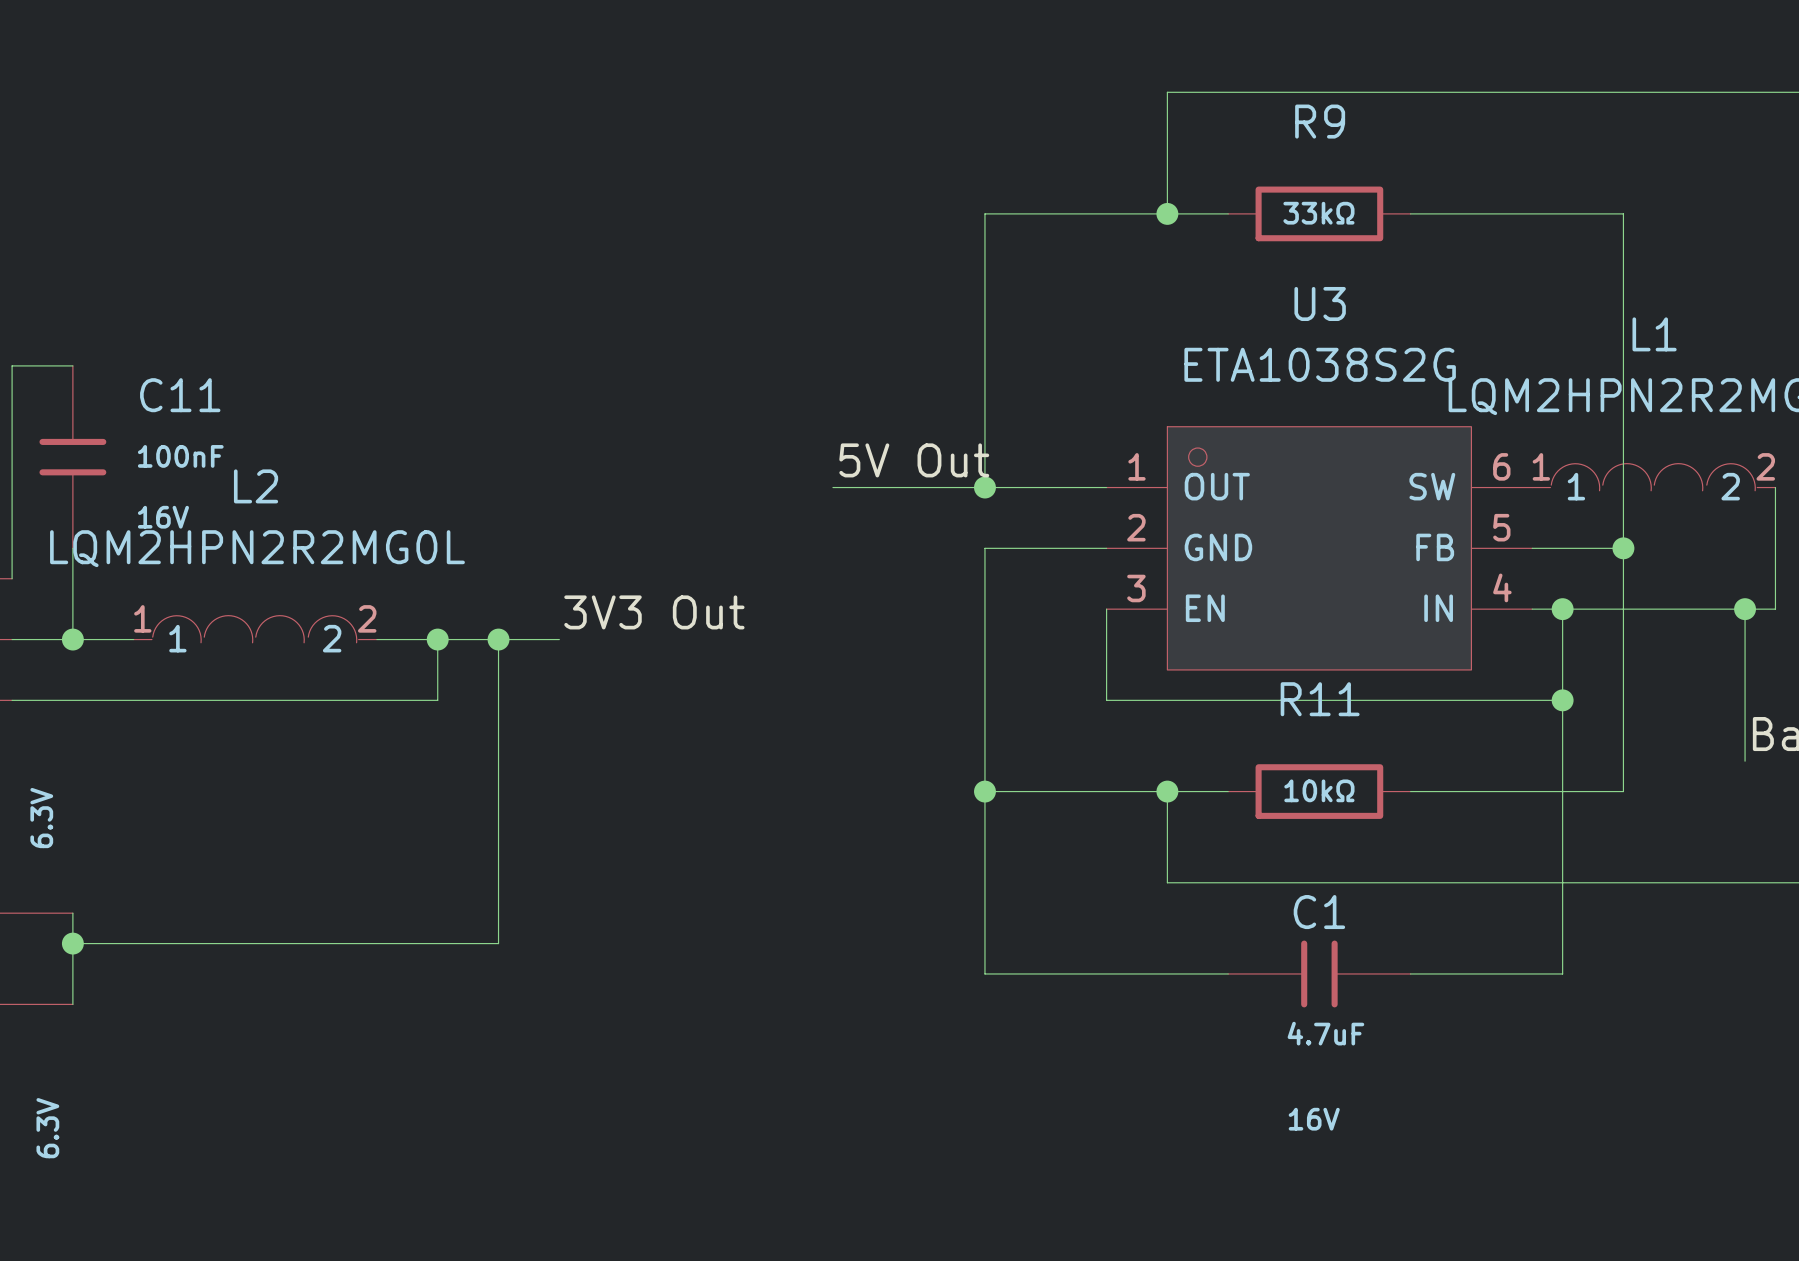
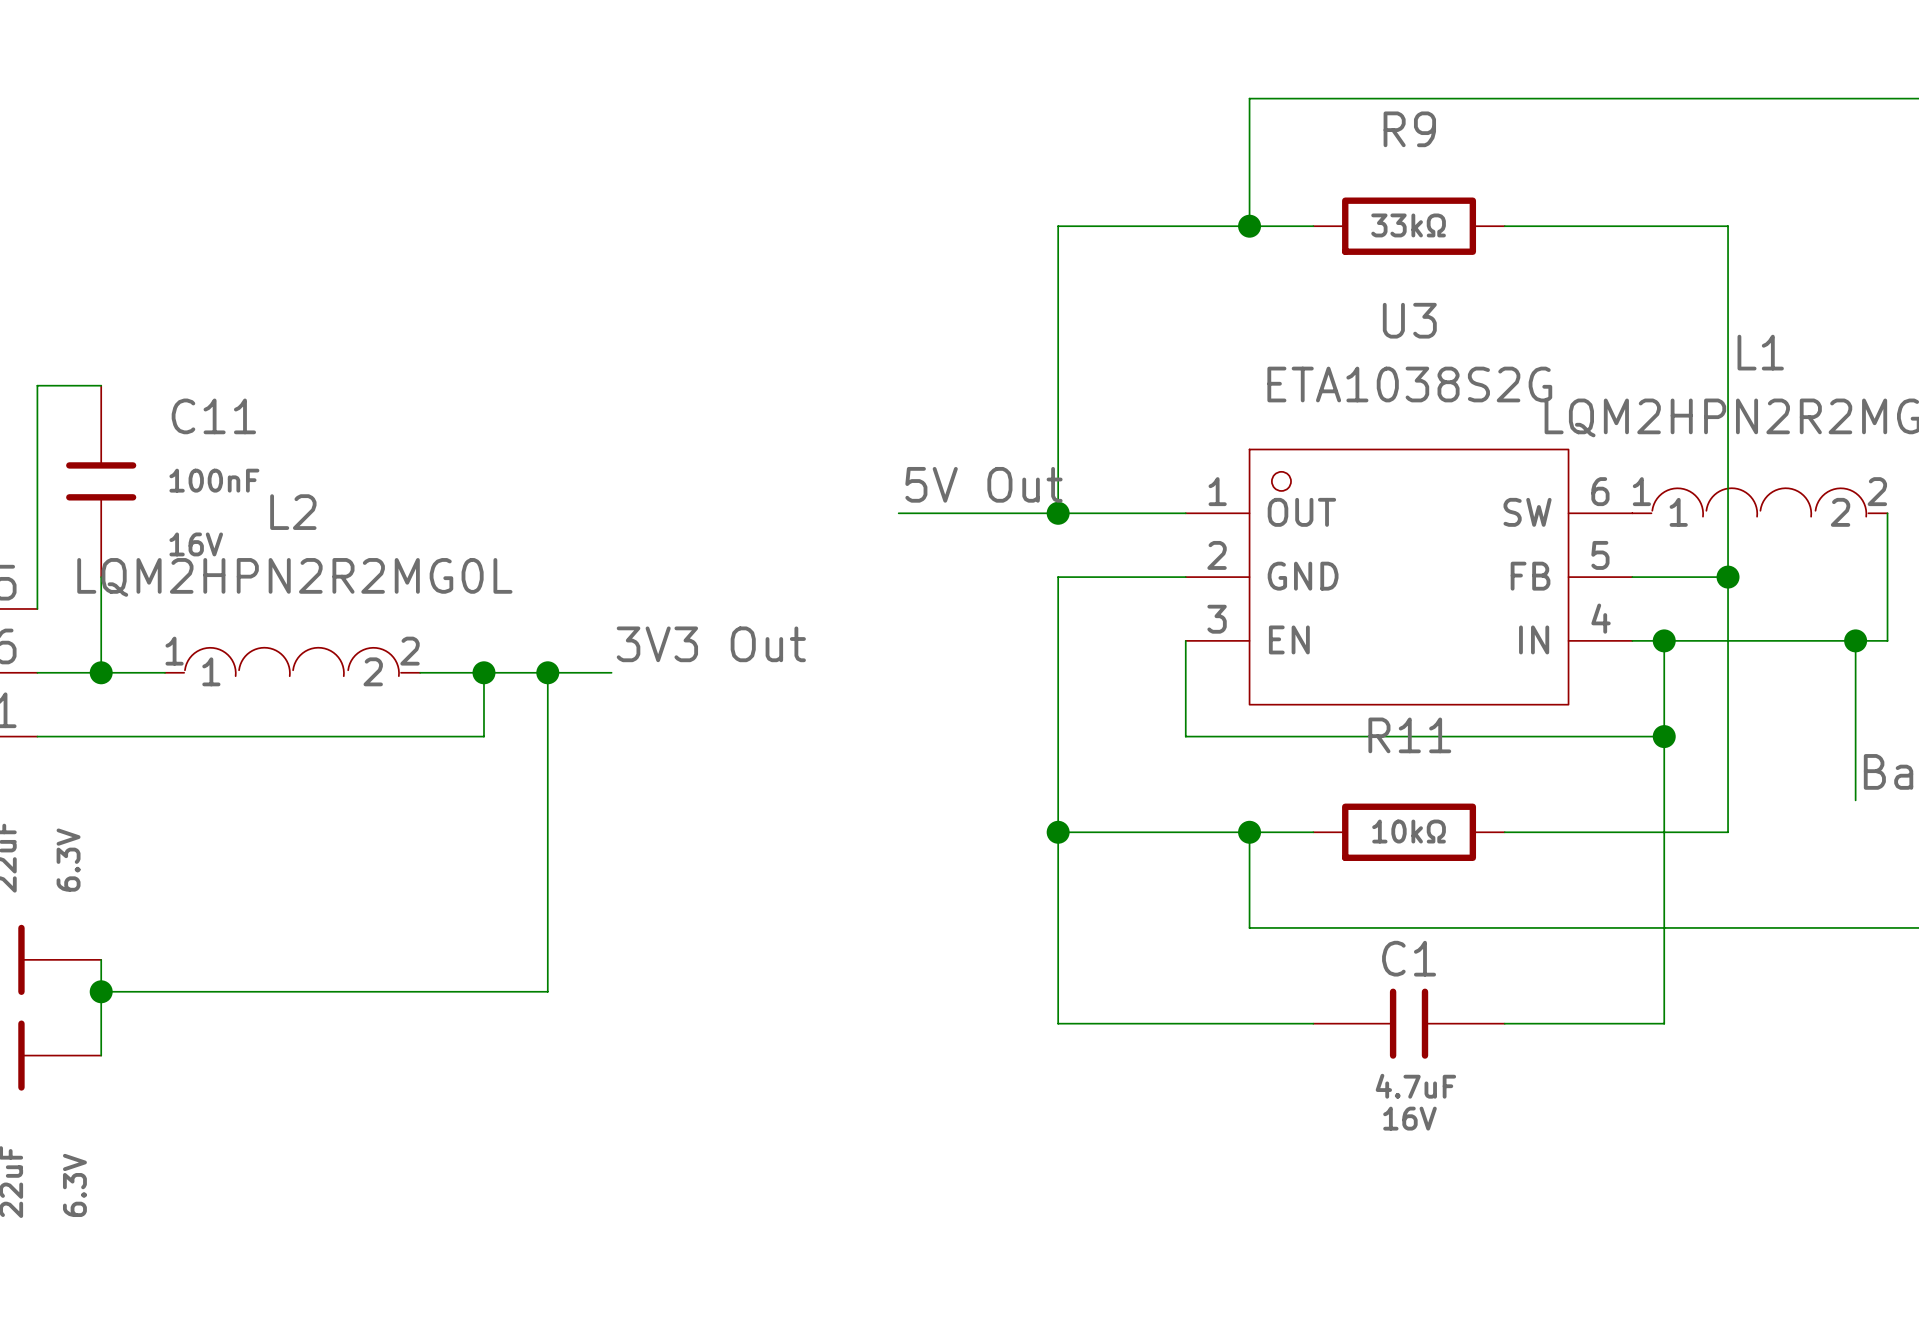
C1 text position: 16V (1314, 1119) -> 16V (1410, 1118)

